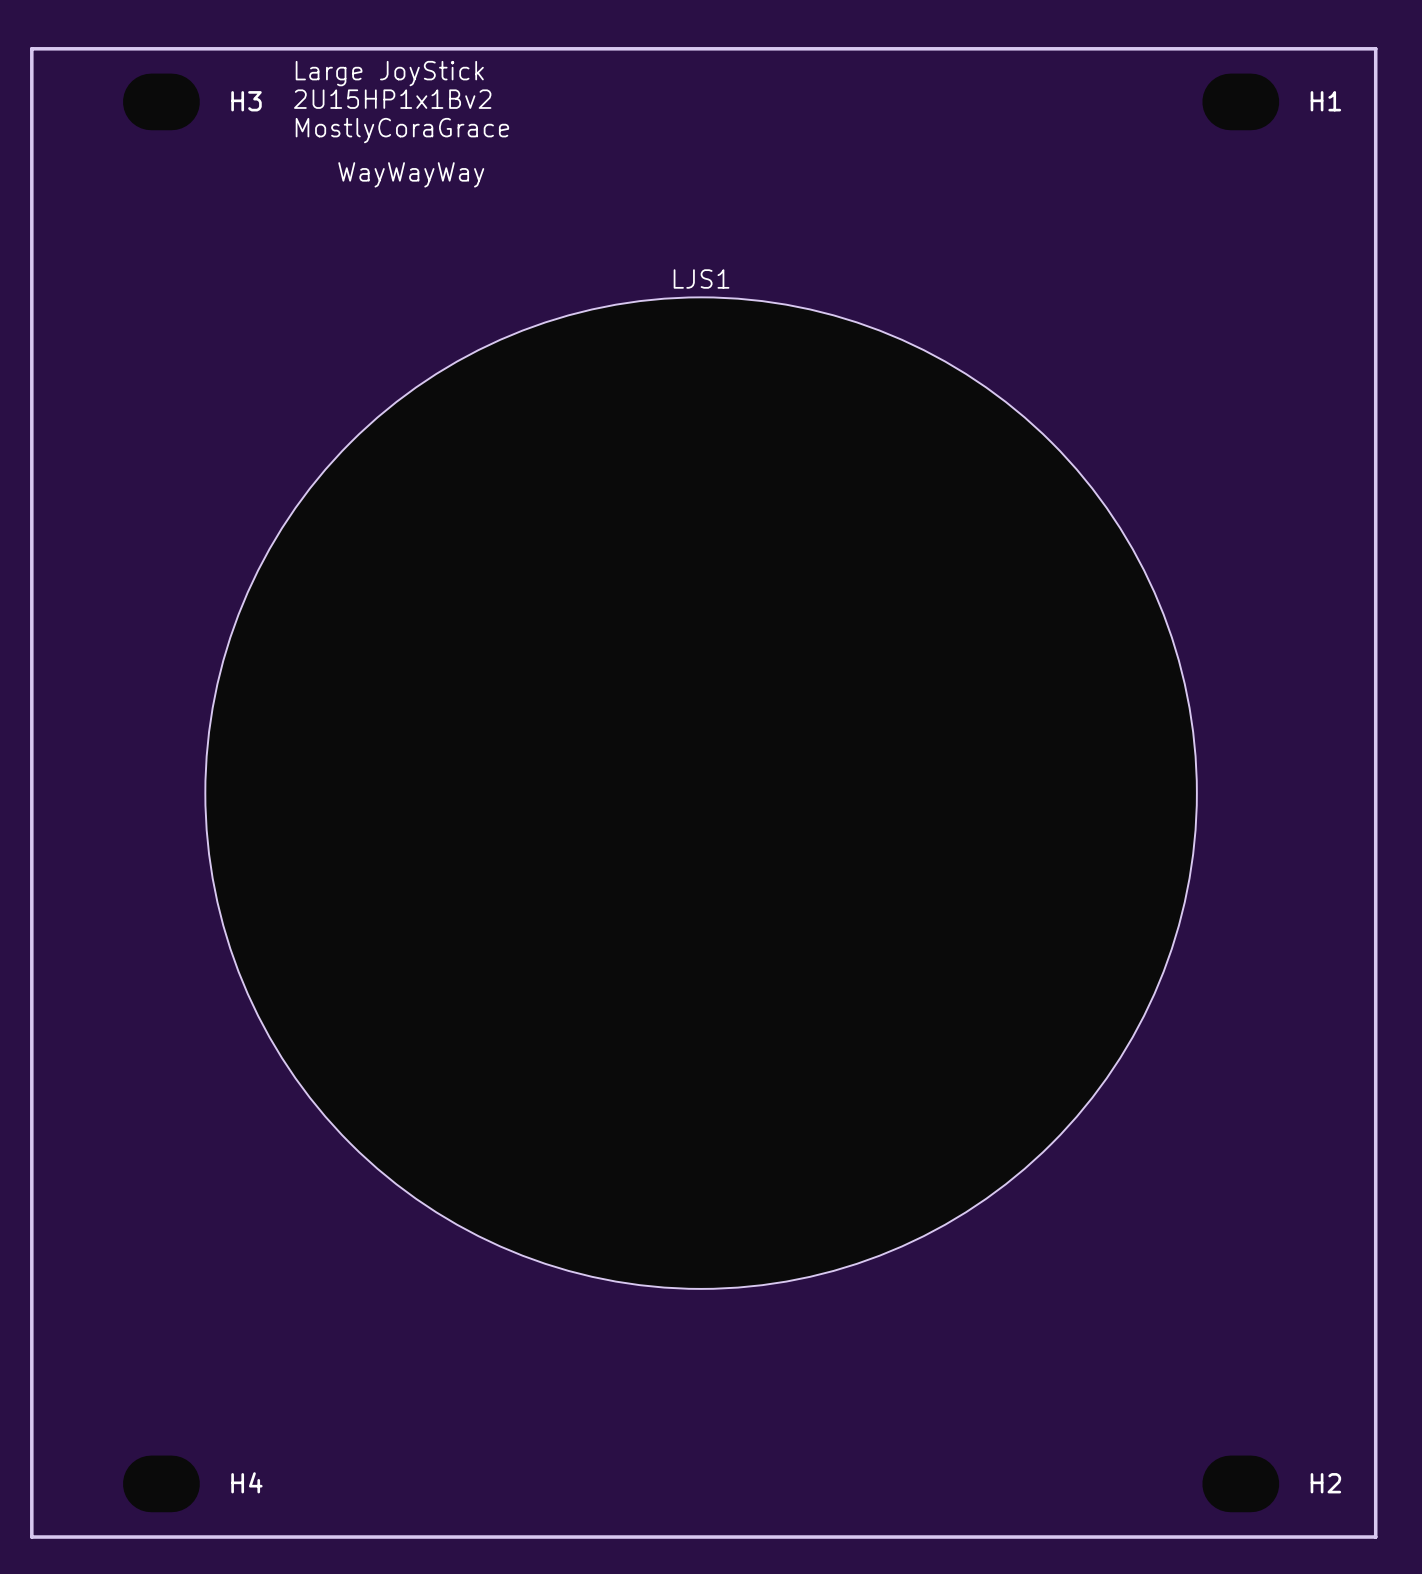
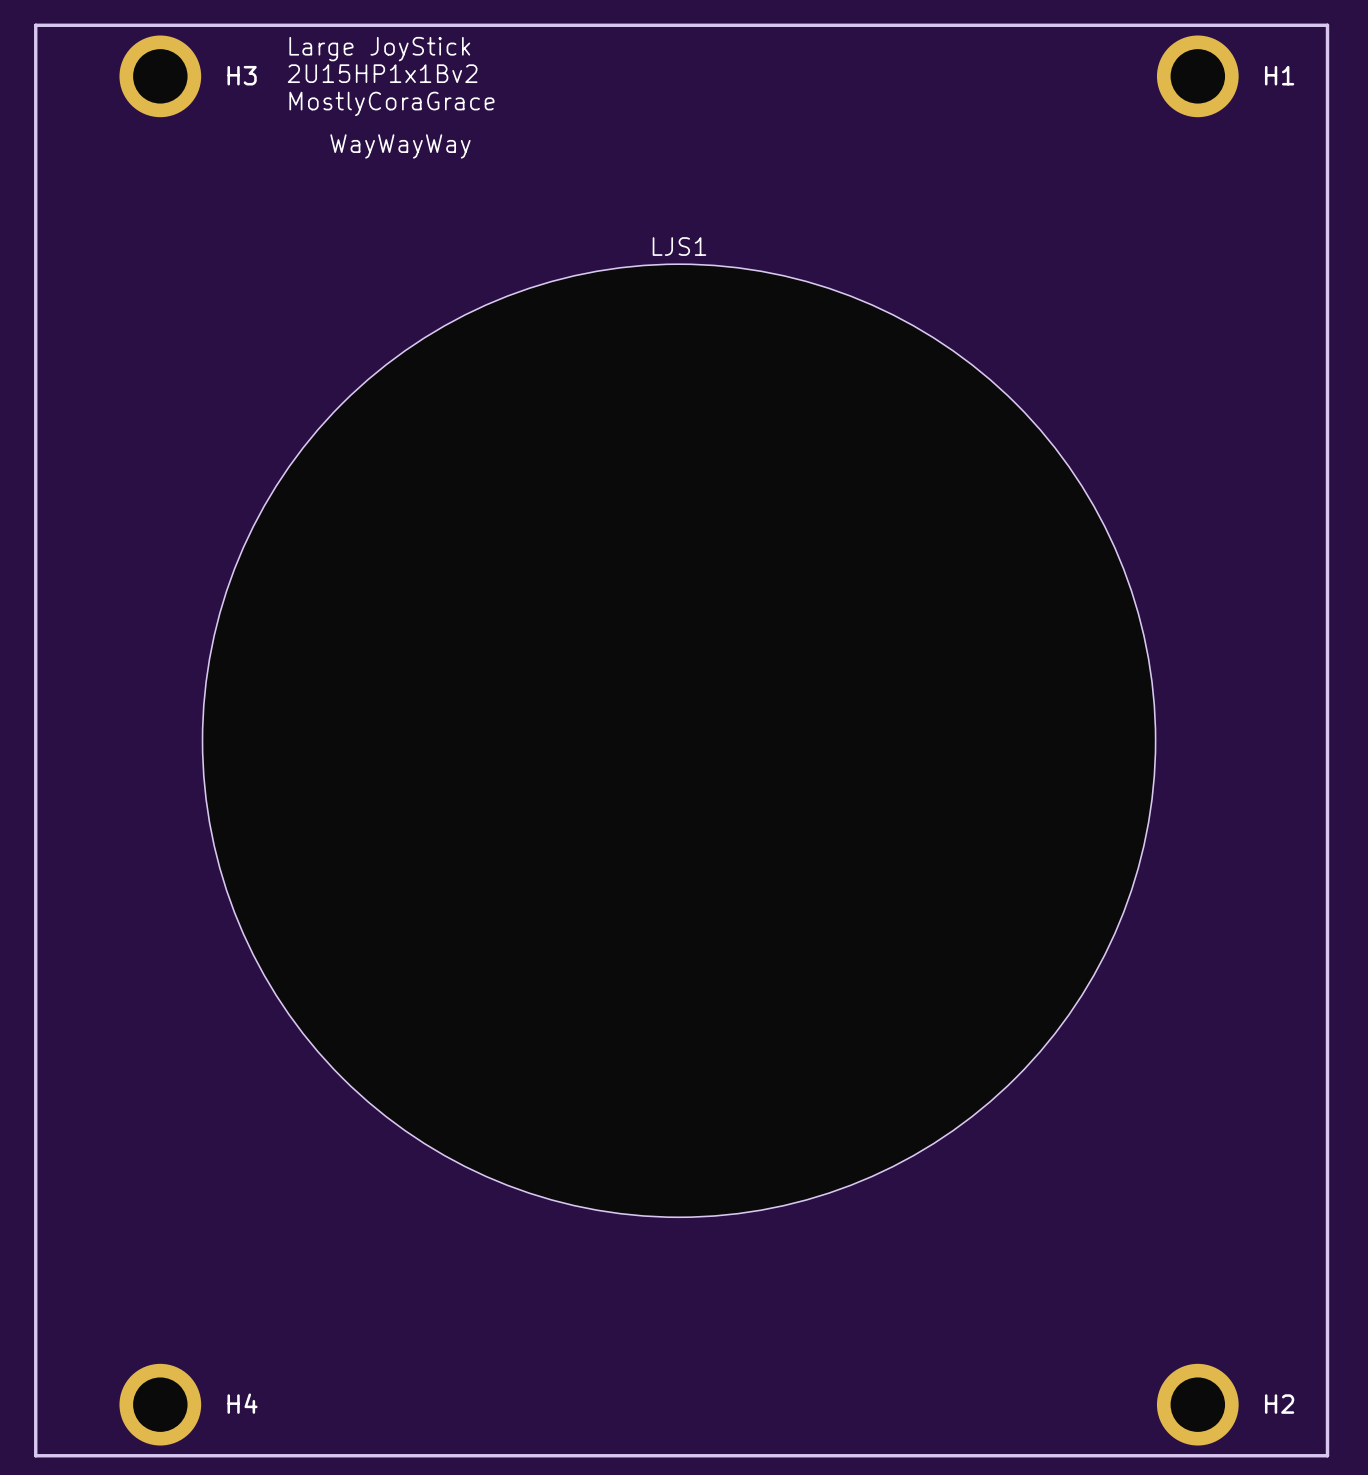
H3 footprint: [123, 73, 200, 131] -> [119, 35, 202, 118]
H1 footprint: [1202, 73, 1280, 131] -> [1156, 35, 1239, 118]
H4 footprint: [123, 1455, 200, 1513] -> [119, 1363, 202, 1446]
H2 footprint: [1202, 1455, 1280, 1513] -> [1156, 1363, 1239, 1446]

